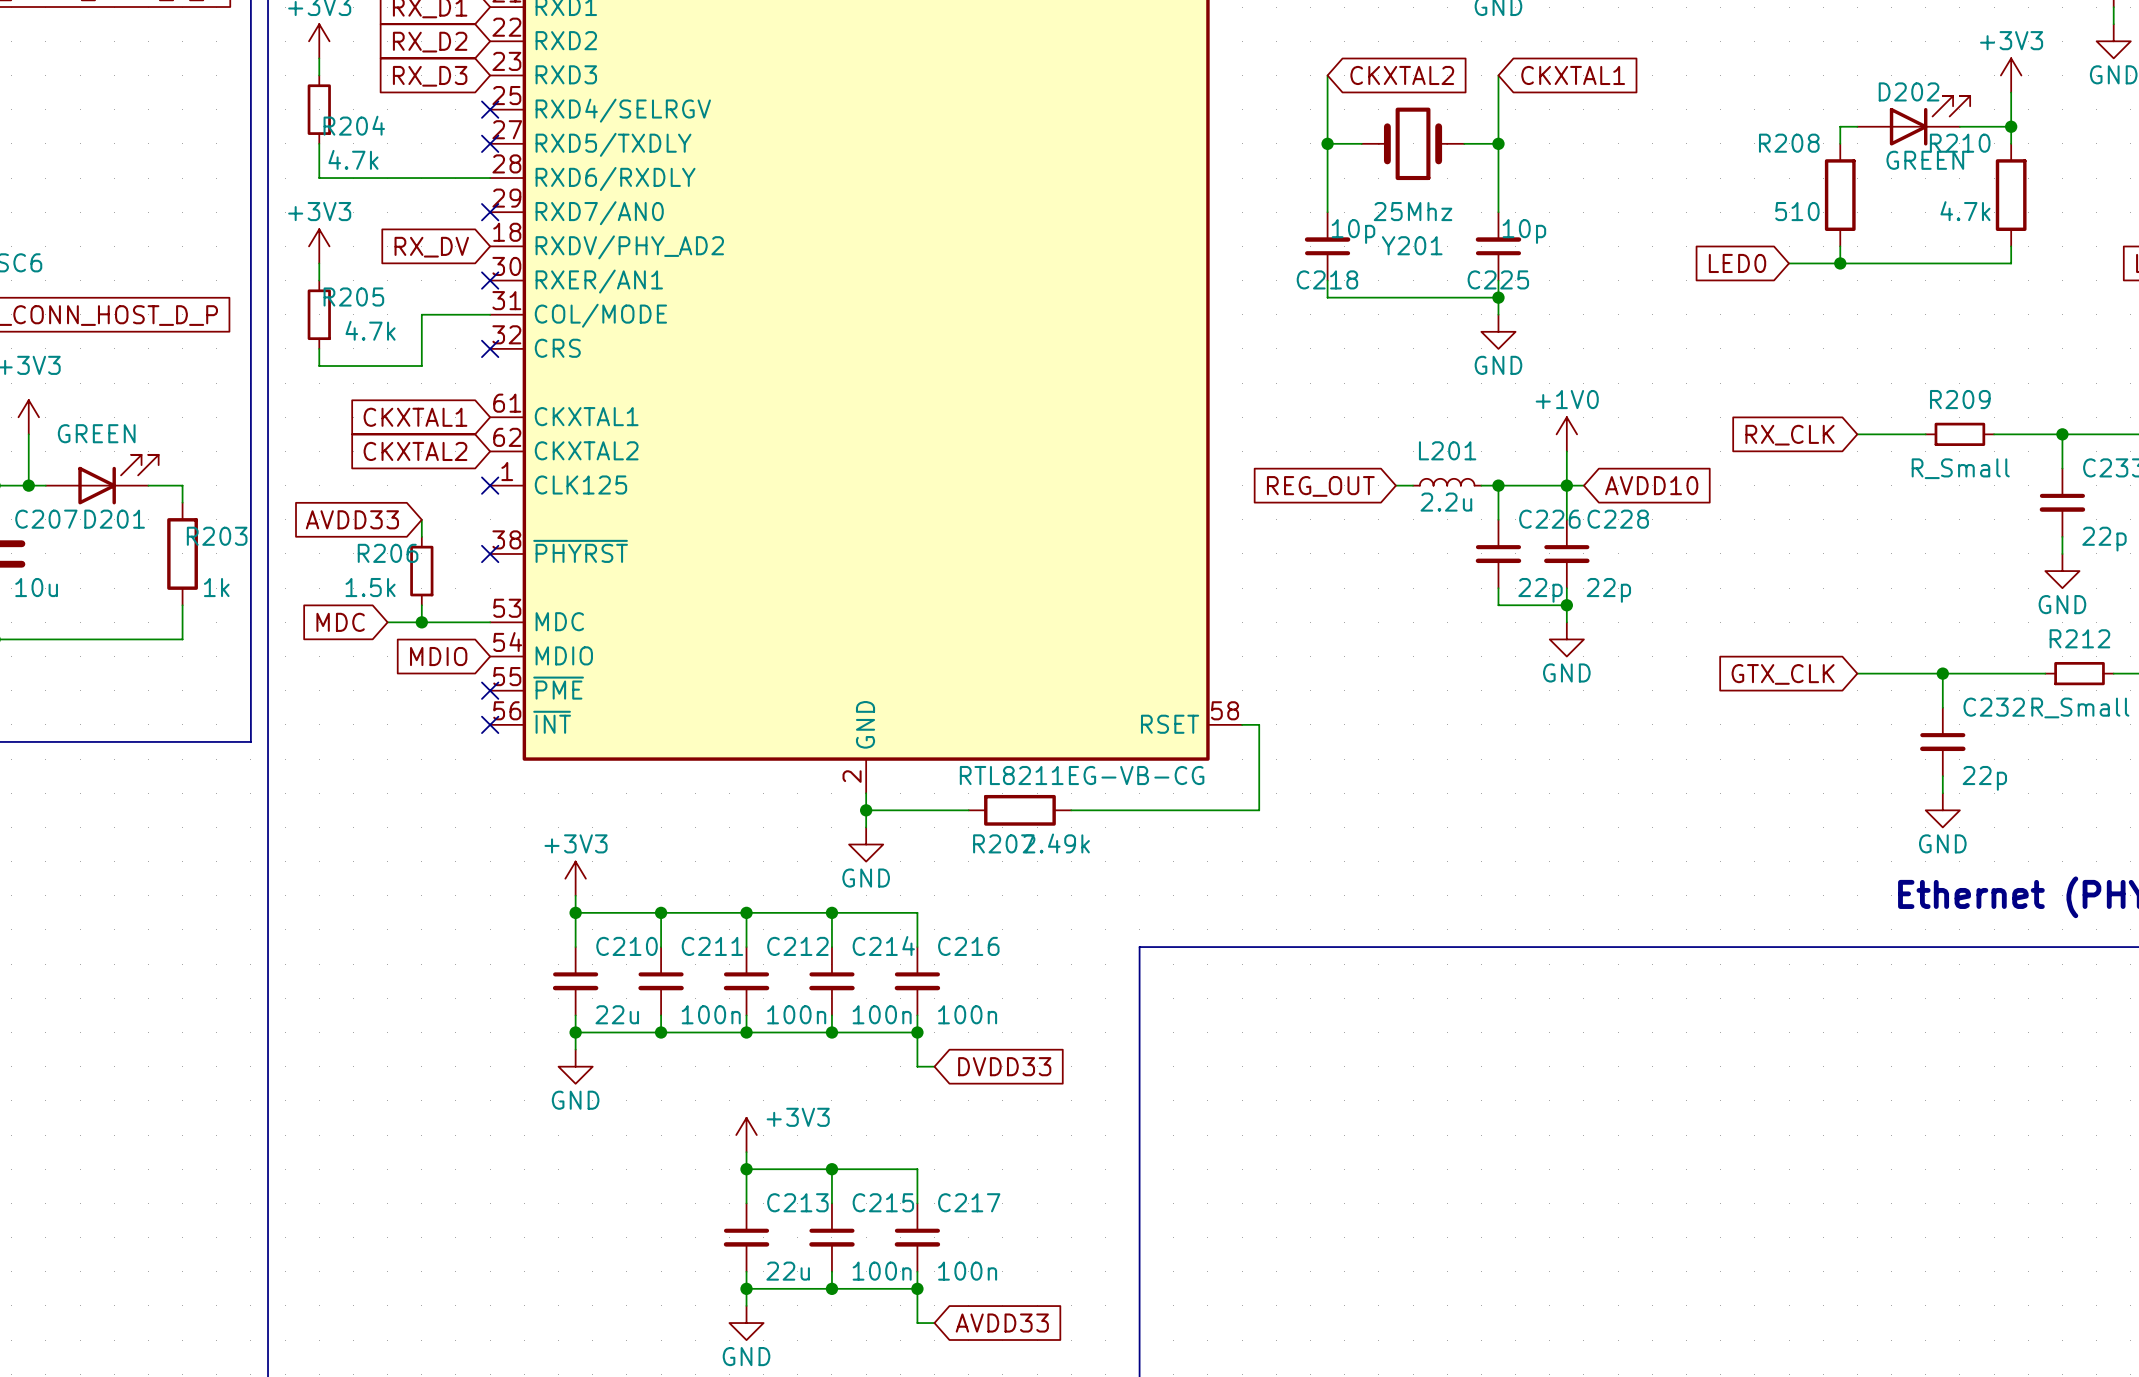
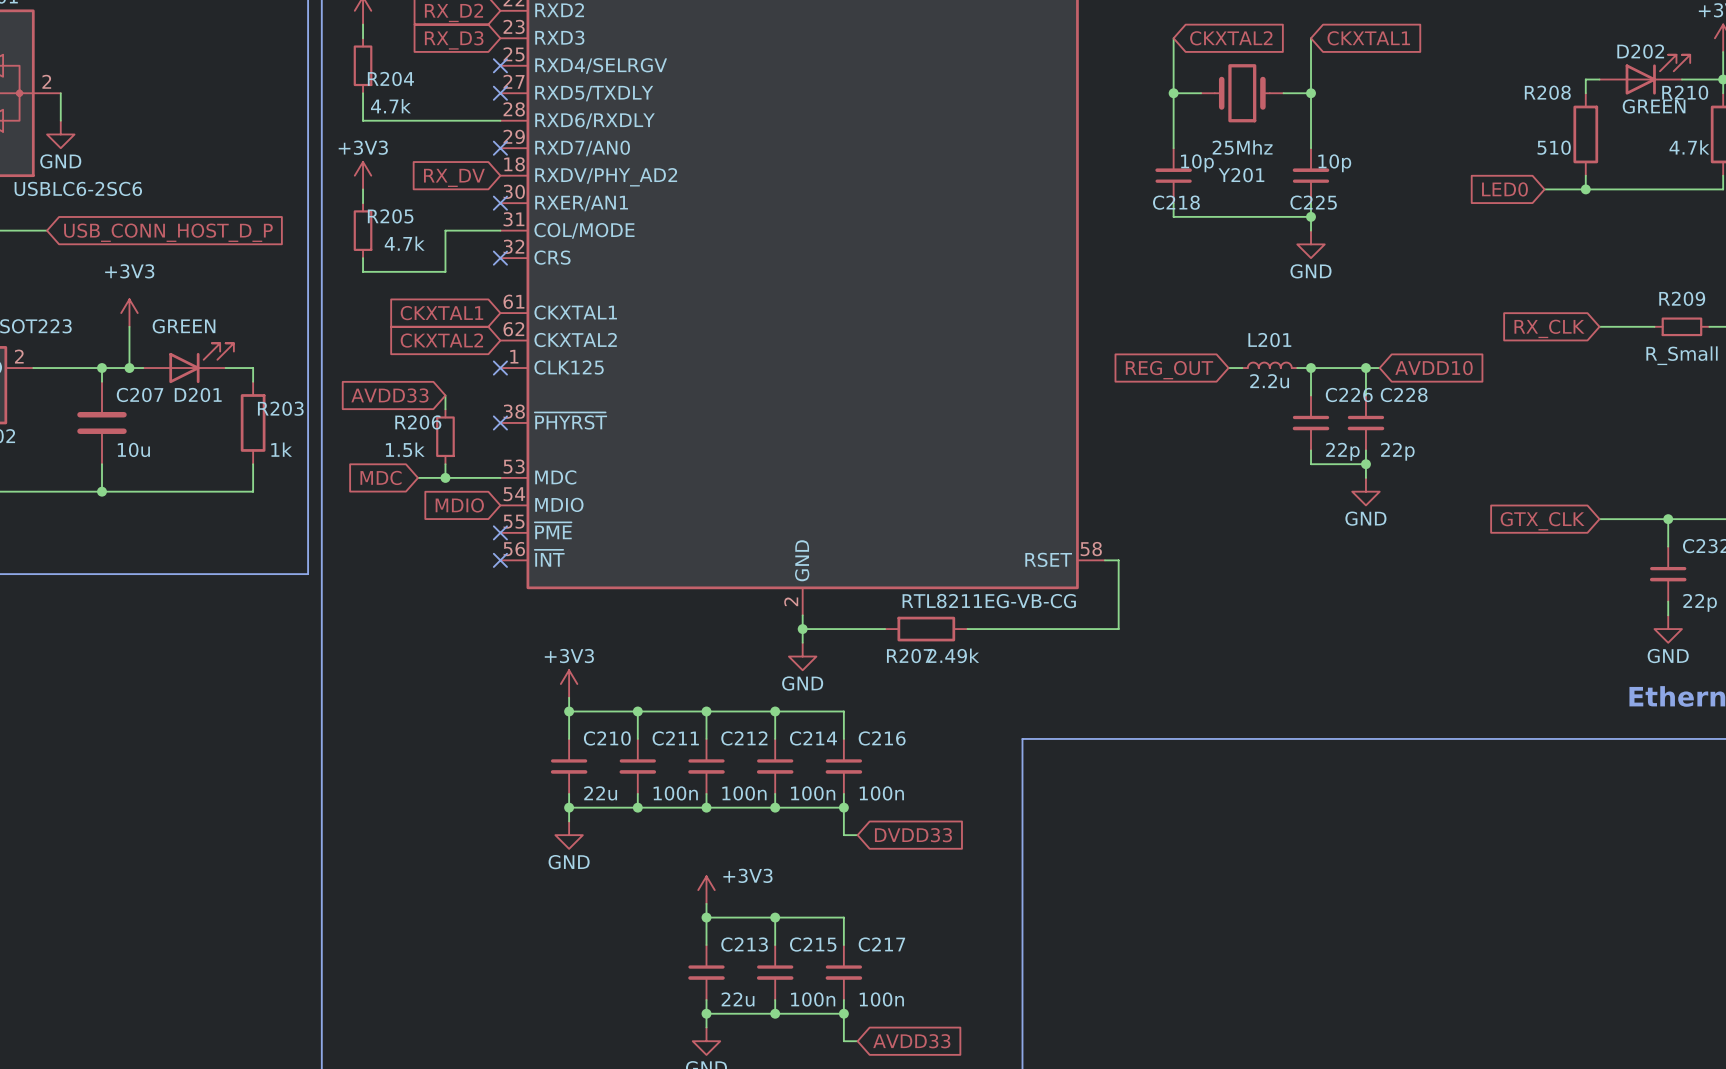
power symbol: +1V0 (1566, 434) -> none
wire: (1566, 451) (1566, 485) -> none

